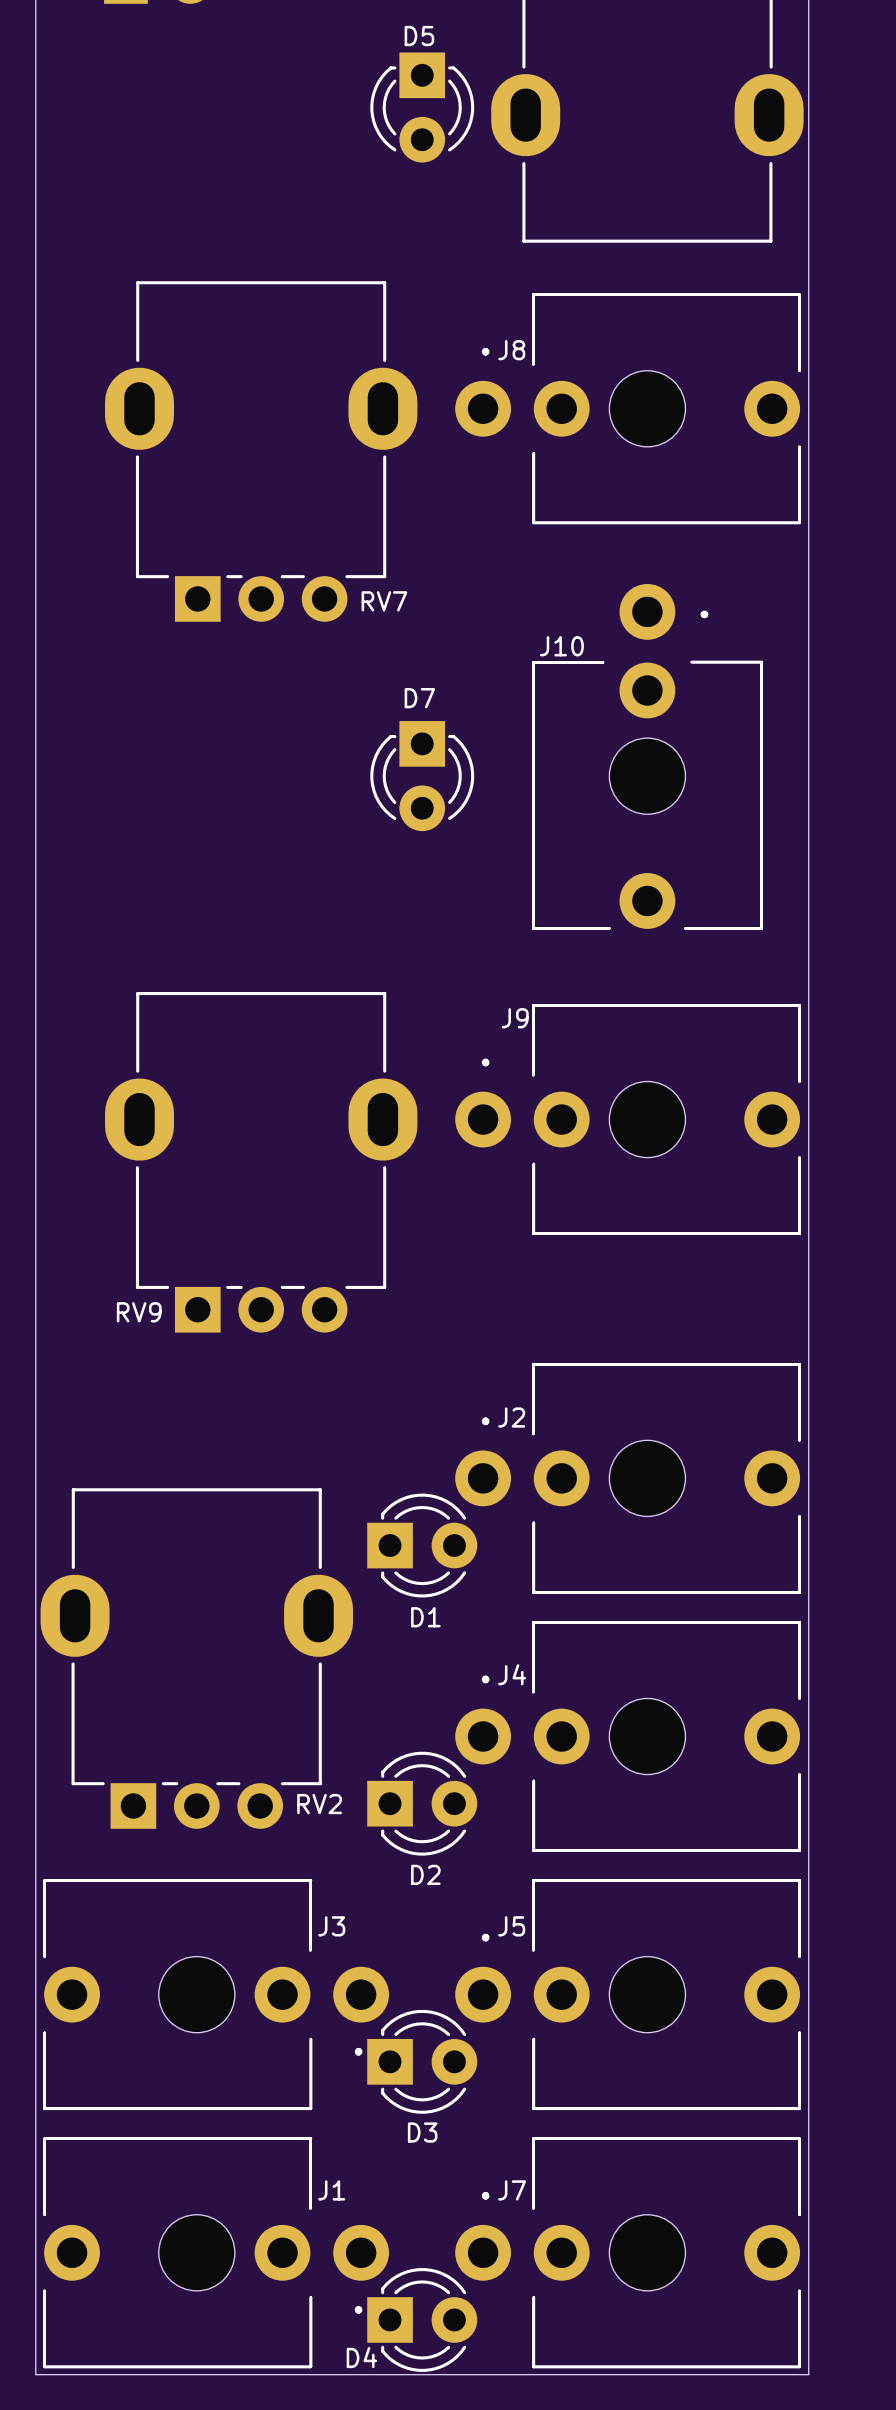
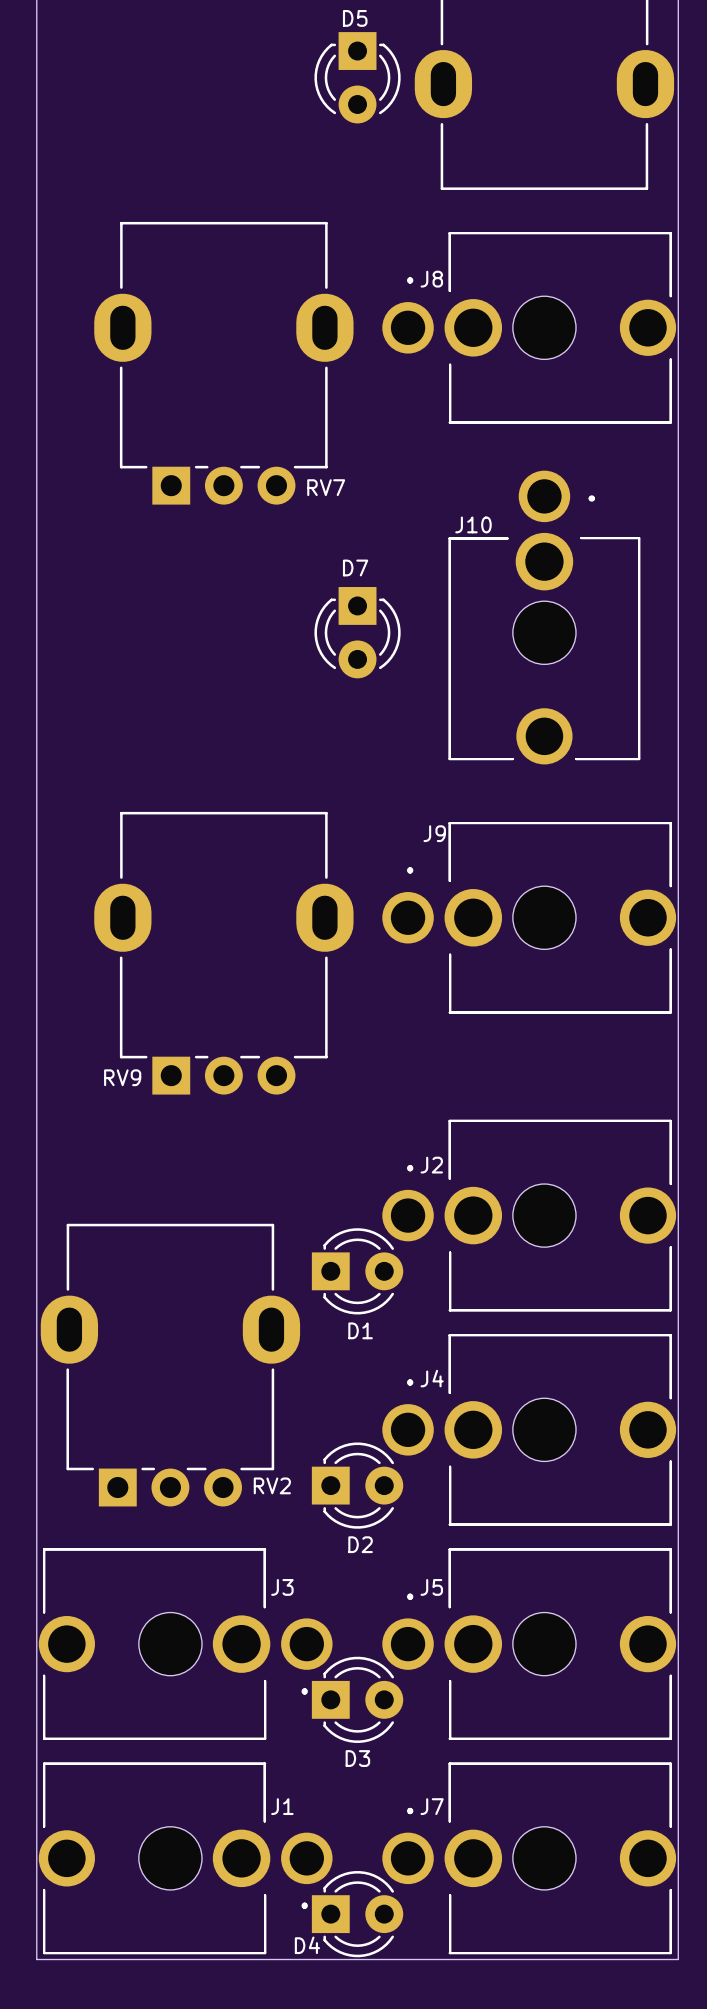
J8 footprint: [455, 293, 801, 525] -> [382, 232, 677, 424]
J10 footprint: [532, 583, 763, 930] -> [448, 470, 641, 765]
J9 footprint: [455, 1004, 801, 1235] -> [382, 822, 677, 1014]
J2 footprint: [455, 1362, 801, 1594] -> [382, 1119, 677, 1312]
J4 footprint: [455, 1621, 801, 1852] -> [382, 1334, 677, 1526]
J3 footprint: [43, 1879, 390, 2111] -> [38, 1548, 333, 1740]
J5 footprint: [455, 1879, 801, 2111] -> [382, 1548, 677, 1740]
J1 footprint: [43, 2137, 390, 2369] -> [38, 1762, 333, 1955]
J7 footprint: [455, 2137, 801, 2369] -> [382, 1762, 677, 1955]

